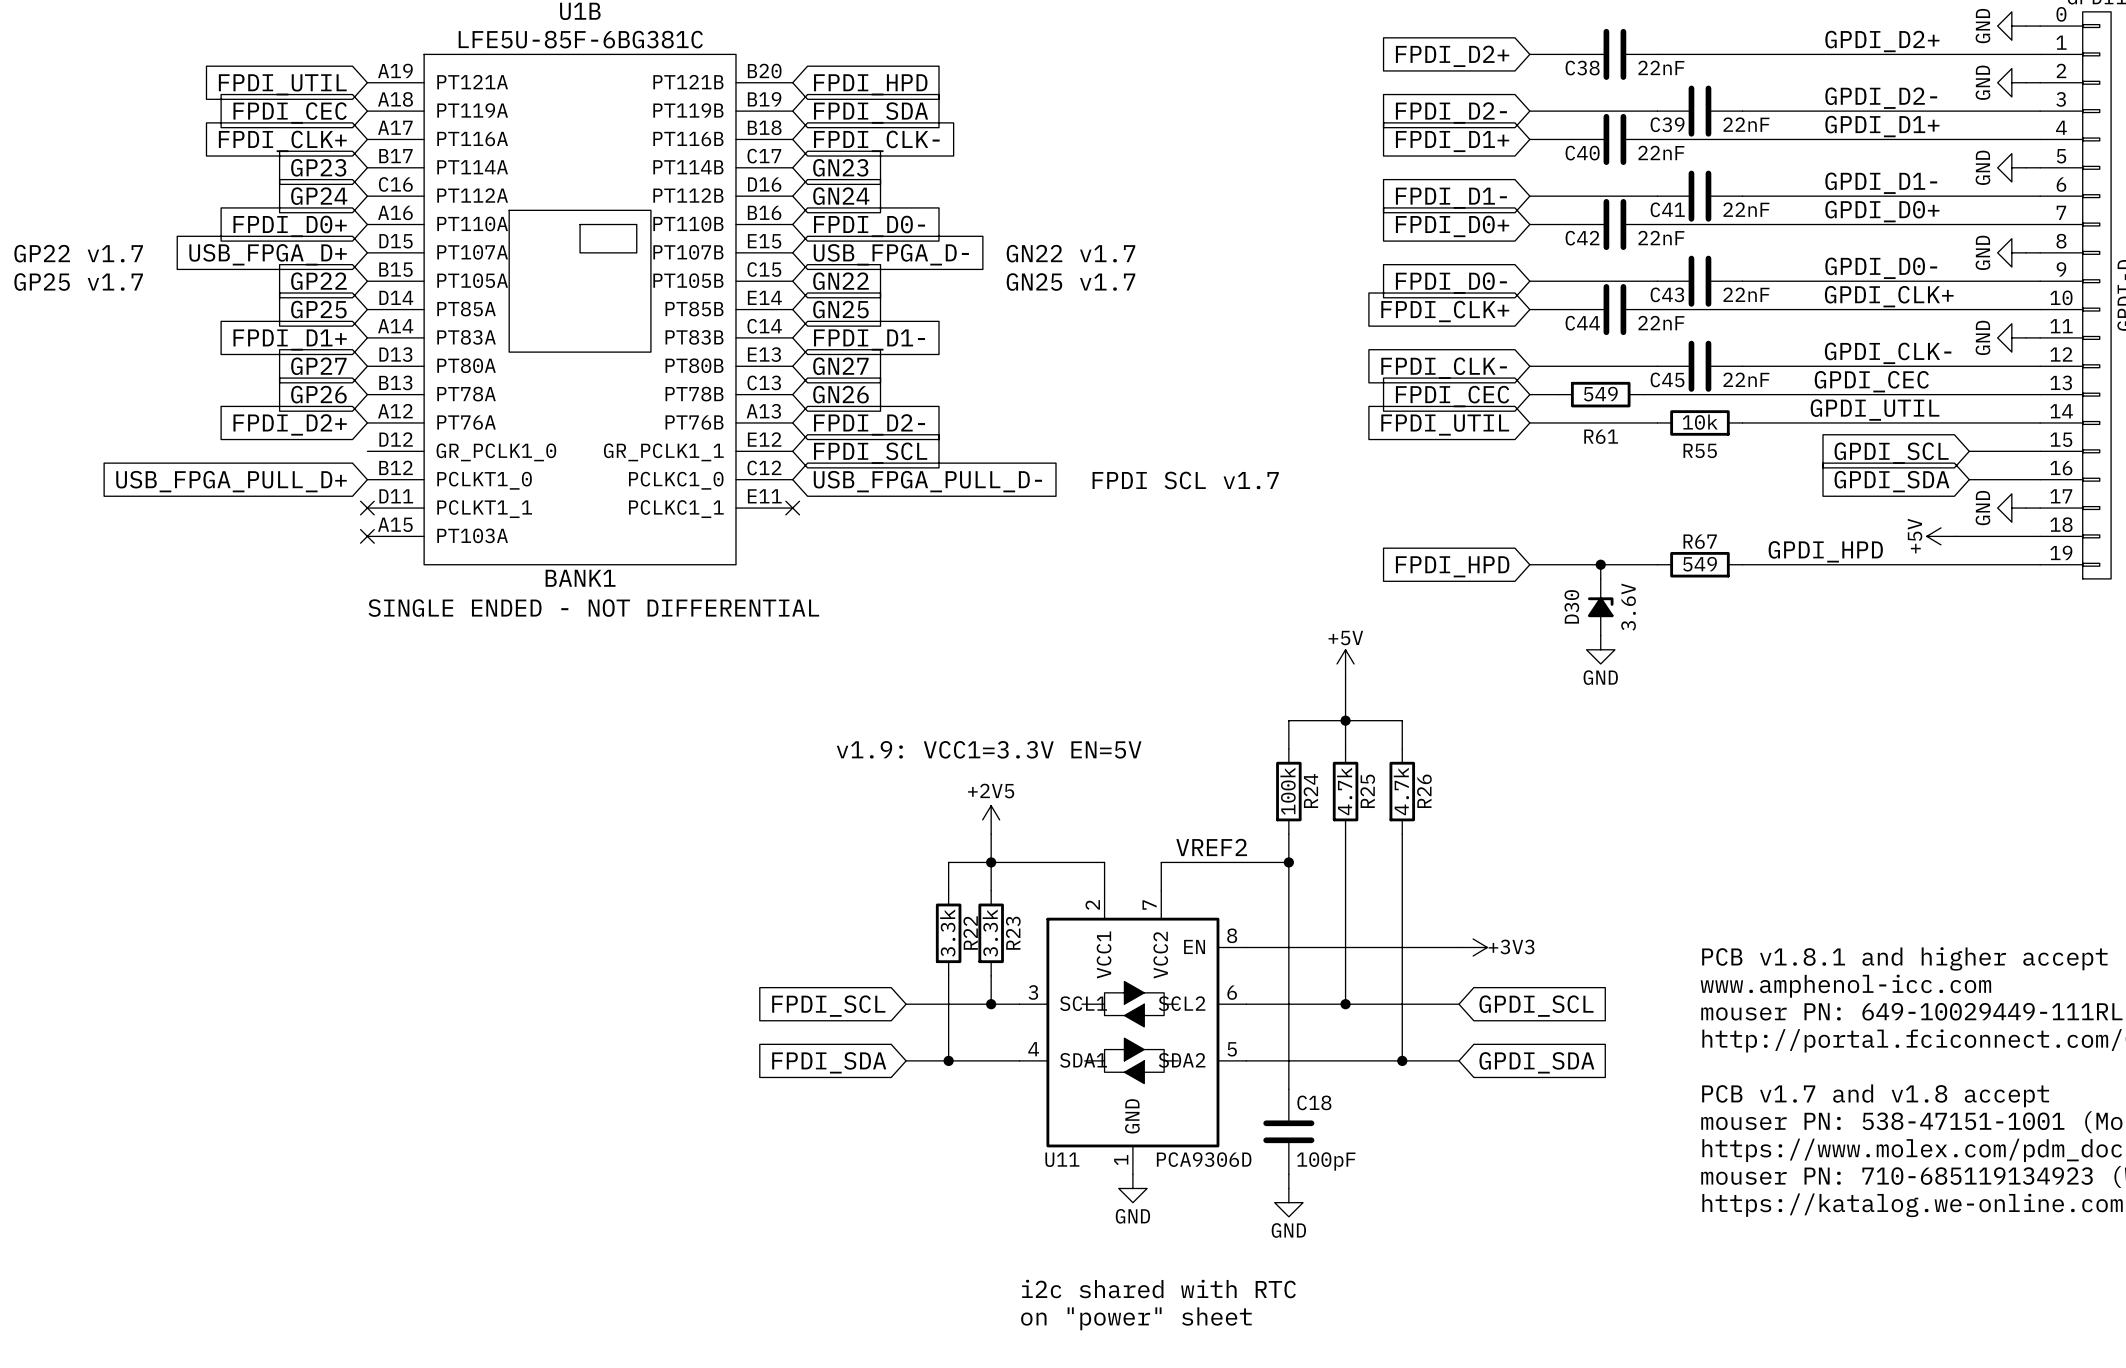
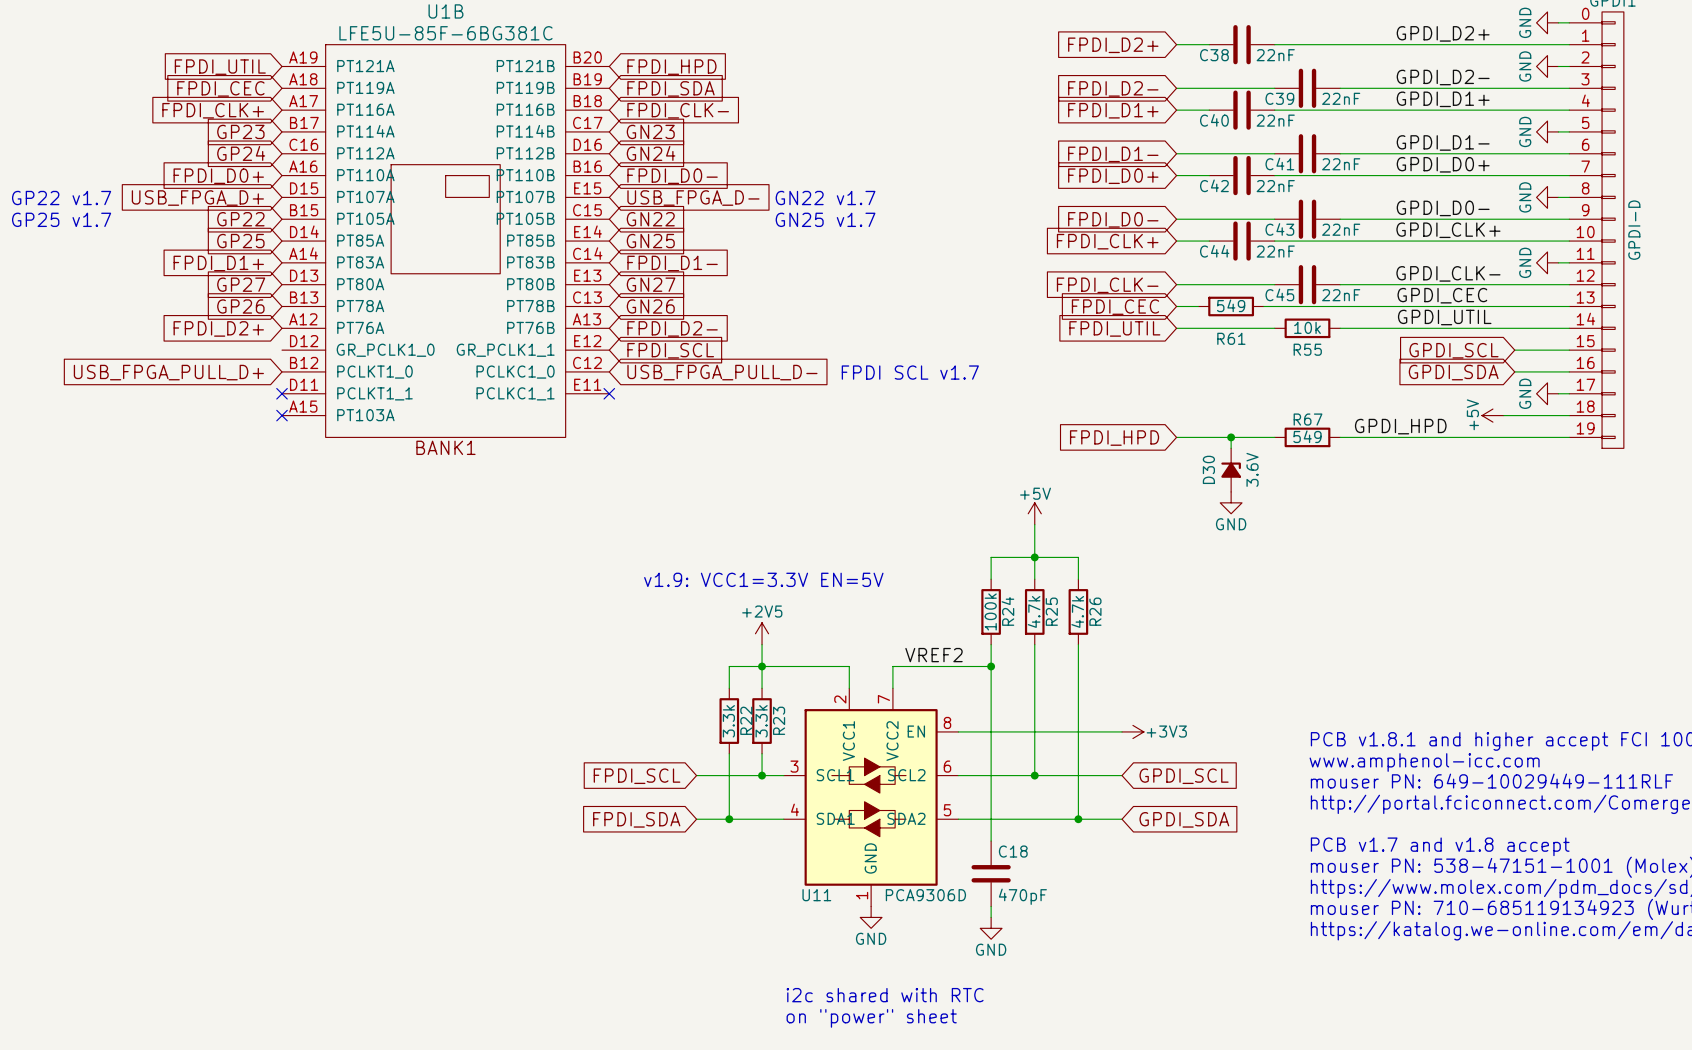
text: SINGLE ENDED - NOT DIFFERENTIAL (593, 608) -> none
C18 value: 100pF (1326, 1161) -> 470pF (1022, 896)

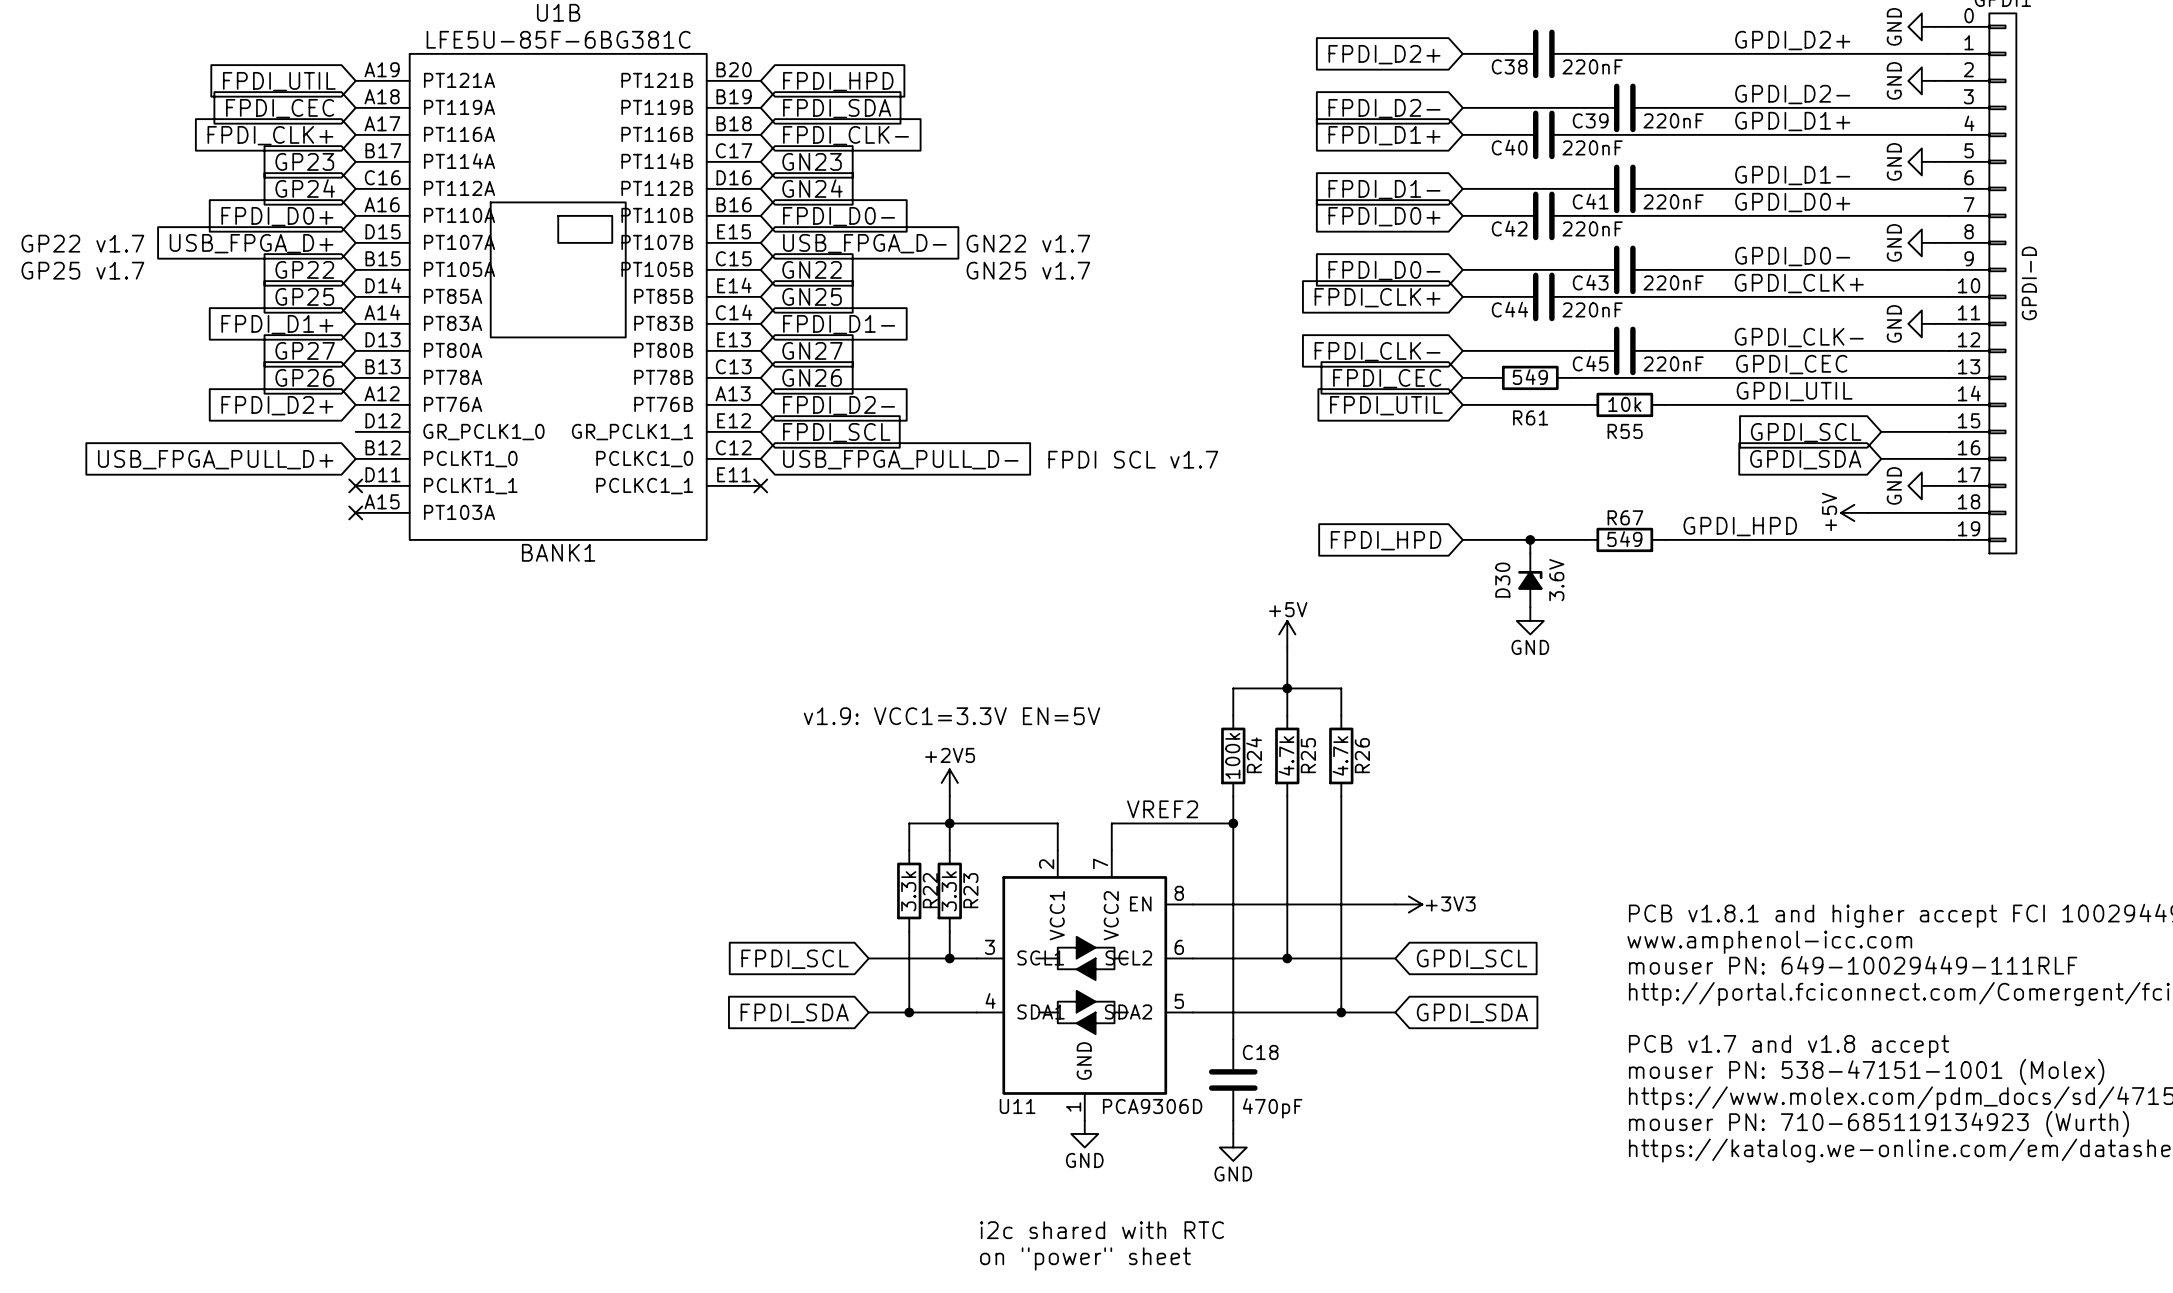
C38 value: 22nF (1275, 55) -> 220nF (1592, 66)
C39 value: 22nF (1341, 98) -> 220nF (1673, 120)
C40 value: 22nF (1275, 120) -> 220nF (1592, 147)
C41 value: 22nF (1341, 164) -> 220nF (1673, 201)
C42 value: 22nF (1275, 186) -> 220nF (1592, 228)
C43 value: 22nF (1341, 229) -> 220nF (1673, 282)
C44 value: 22nF (1275, 251) -> 220nF (1592, 309)
C45 value: 22nF (1341, 295) -> 220nF (1673, 363)

